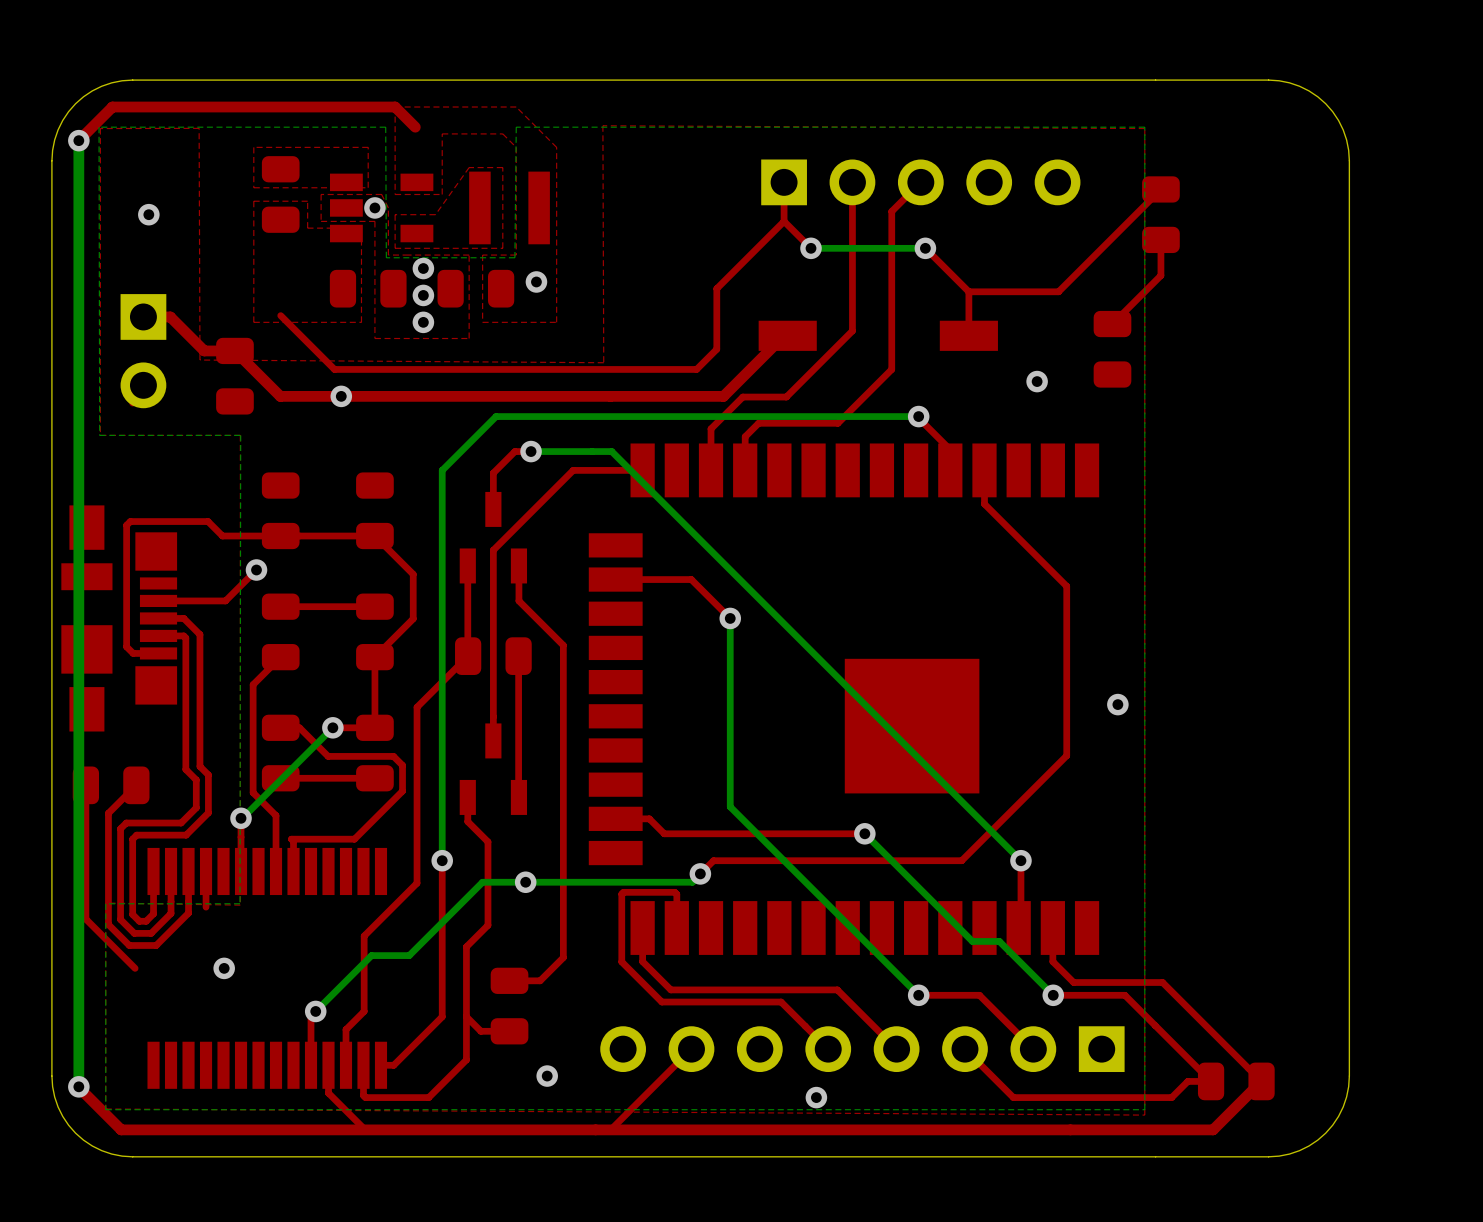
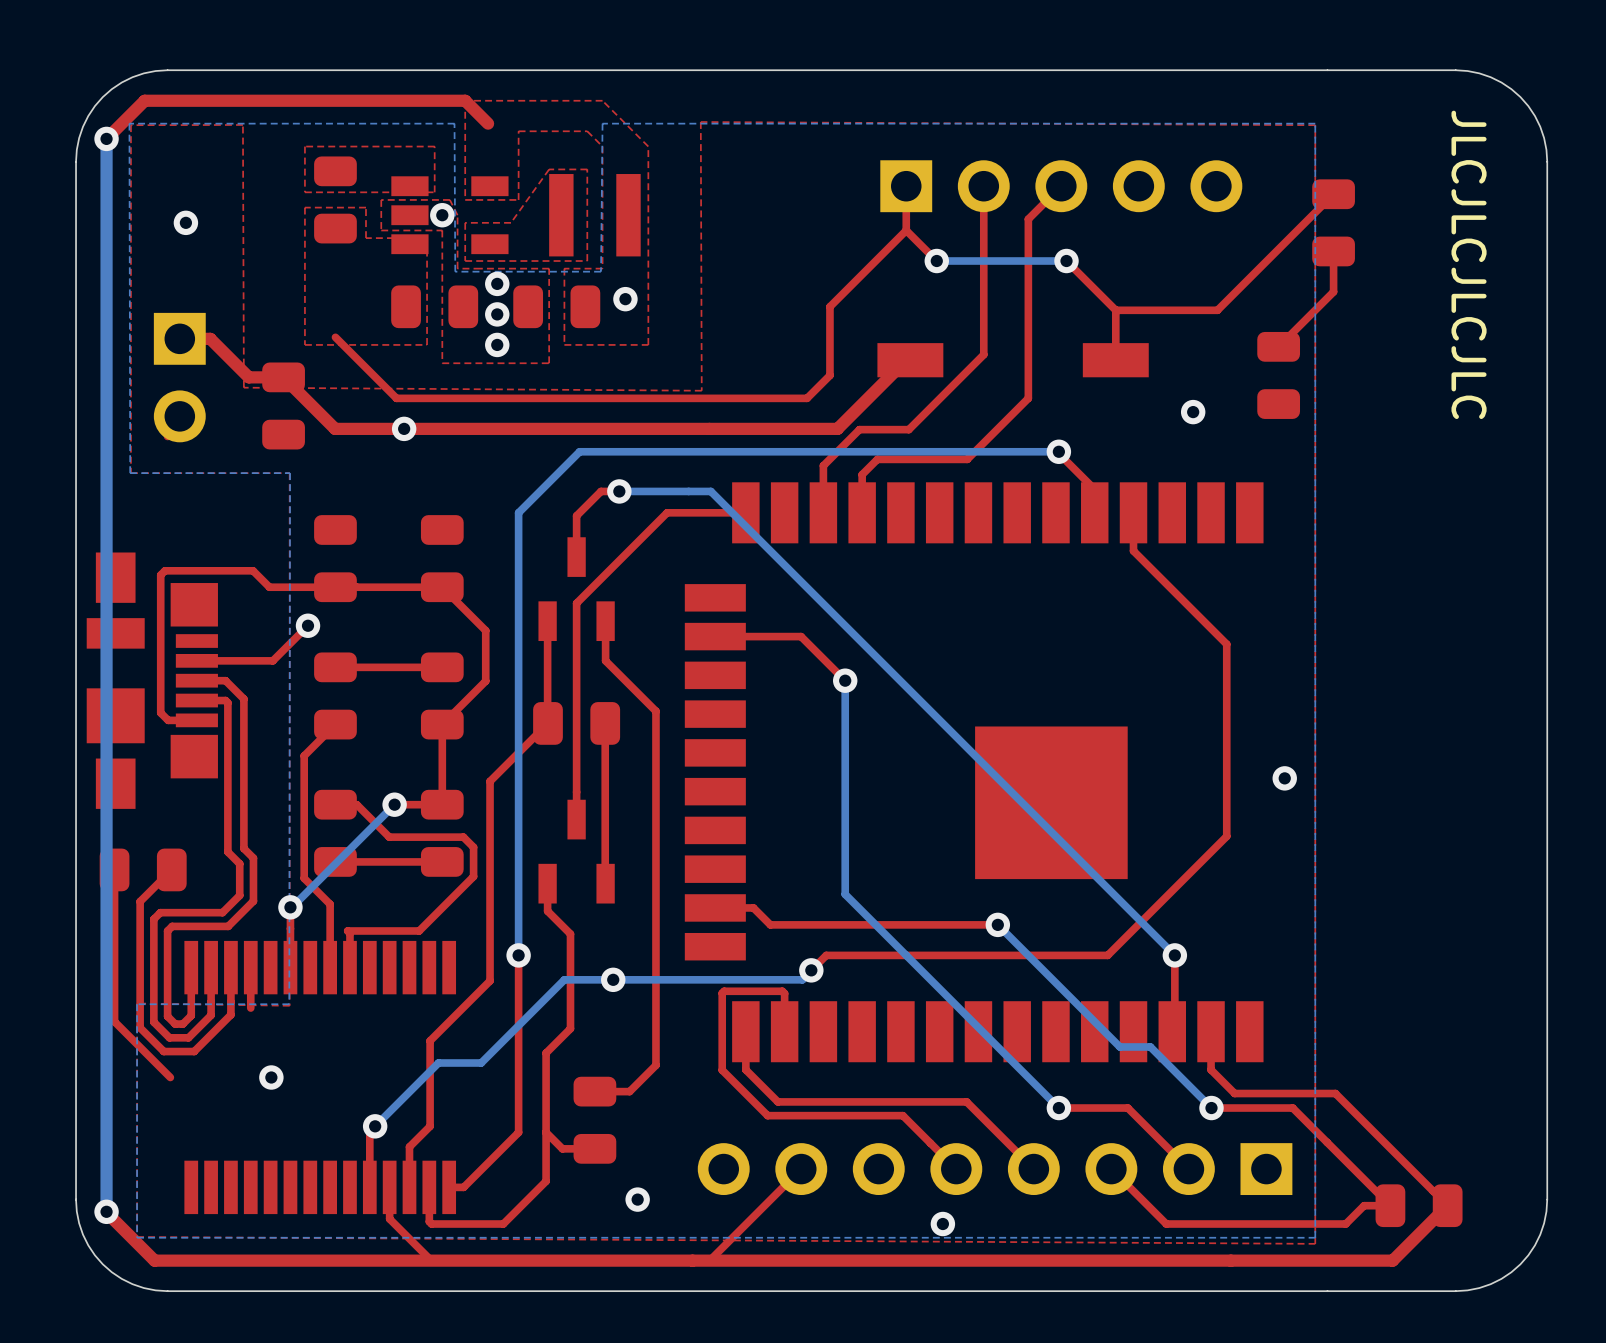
text: none -> JLCJLCJLCJLC (1469, 264)

